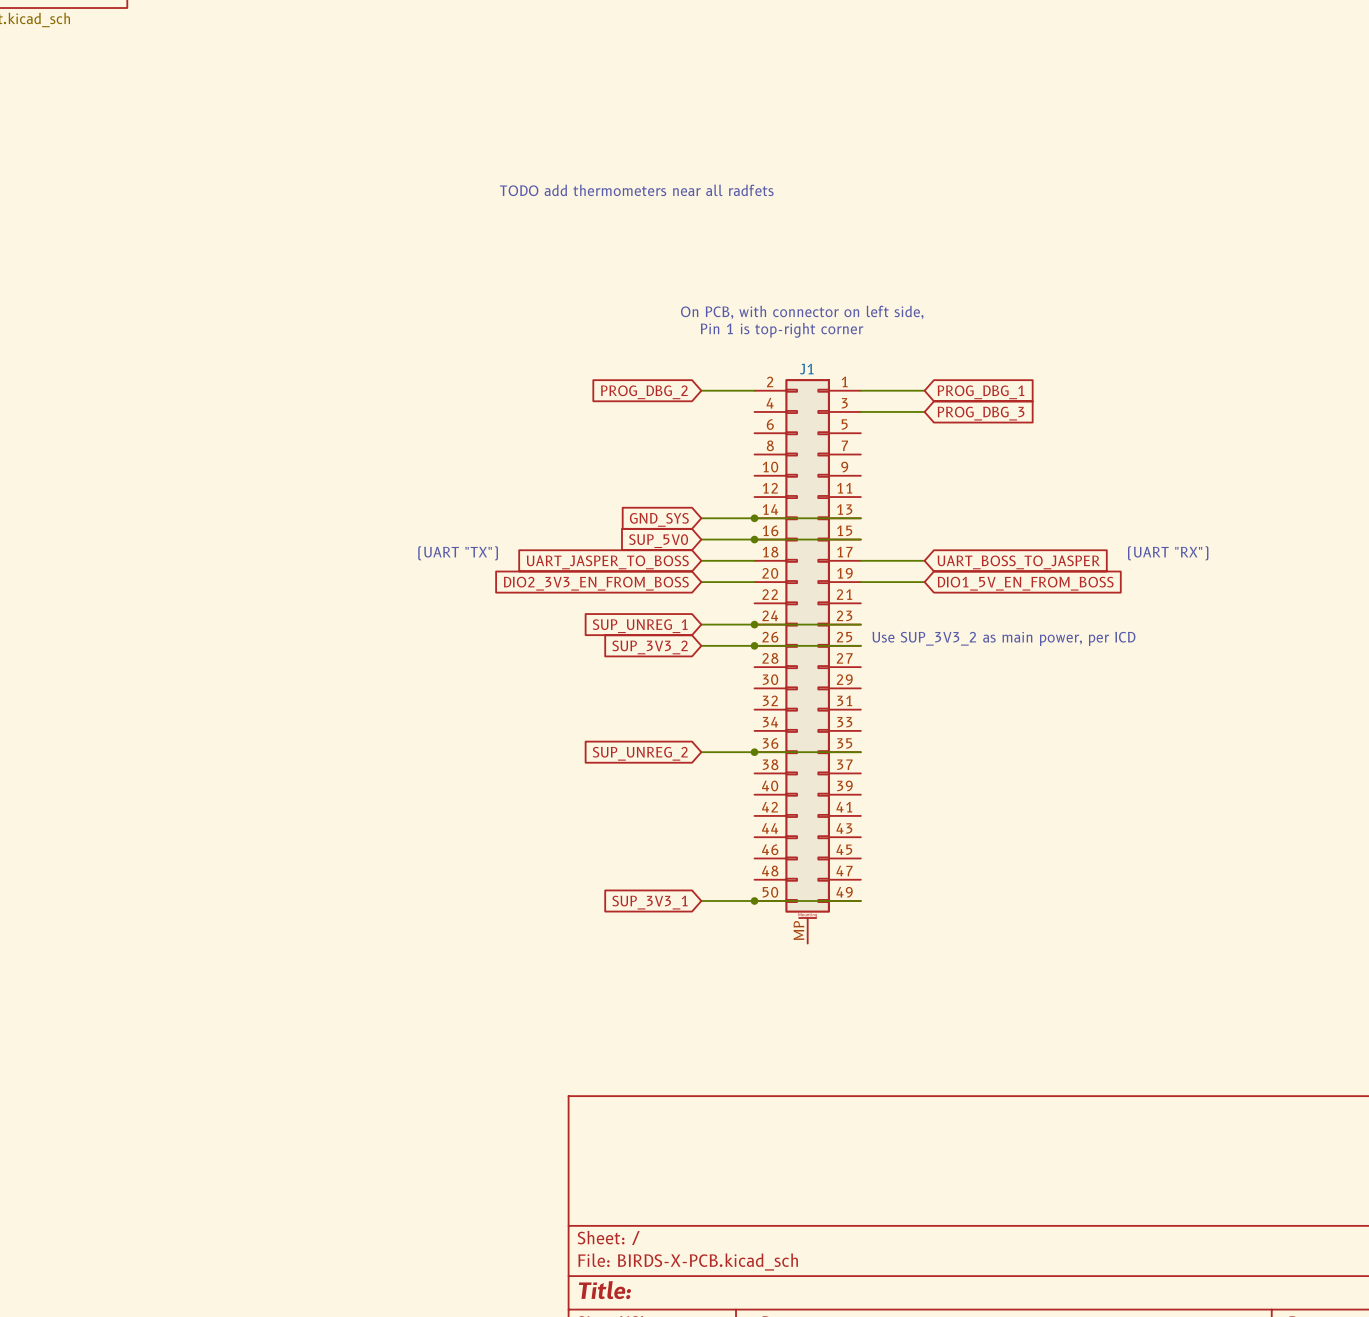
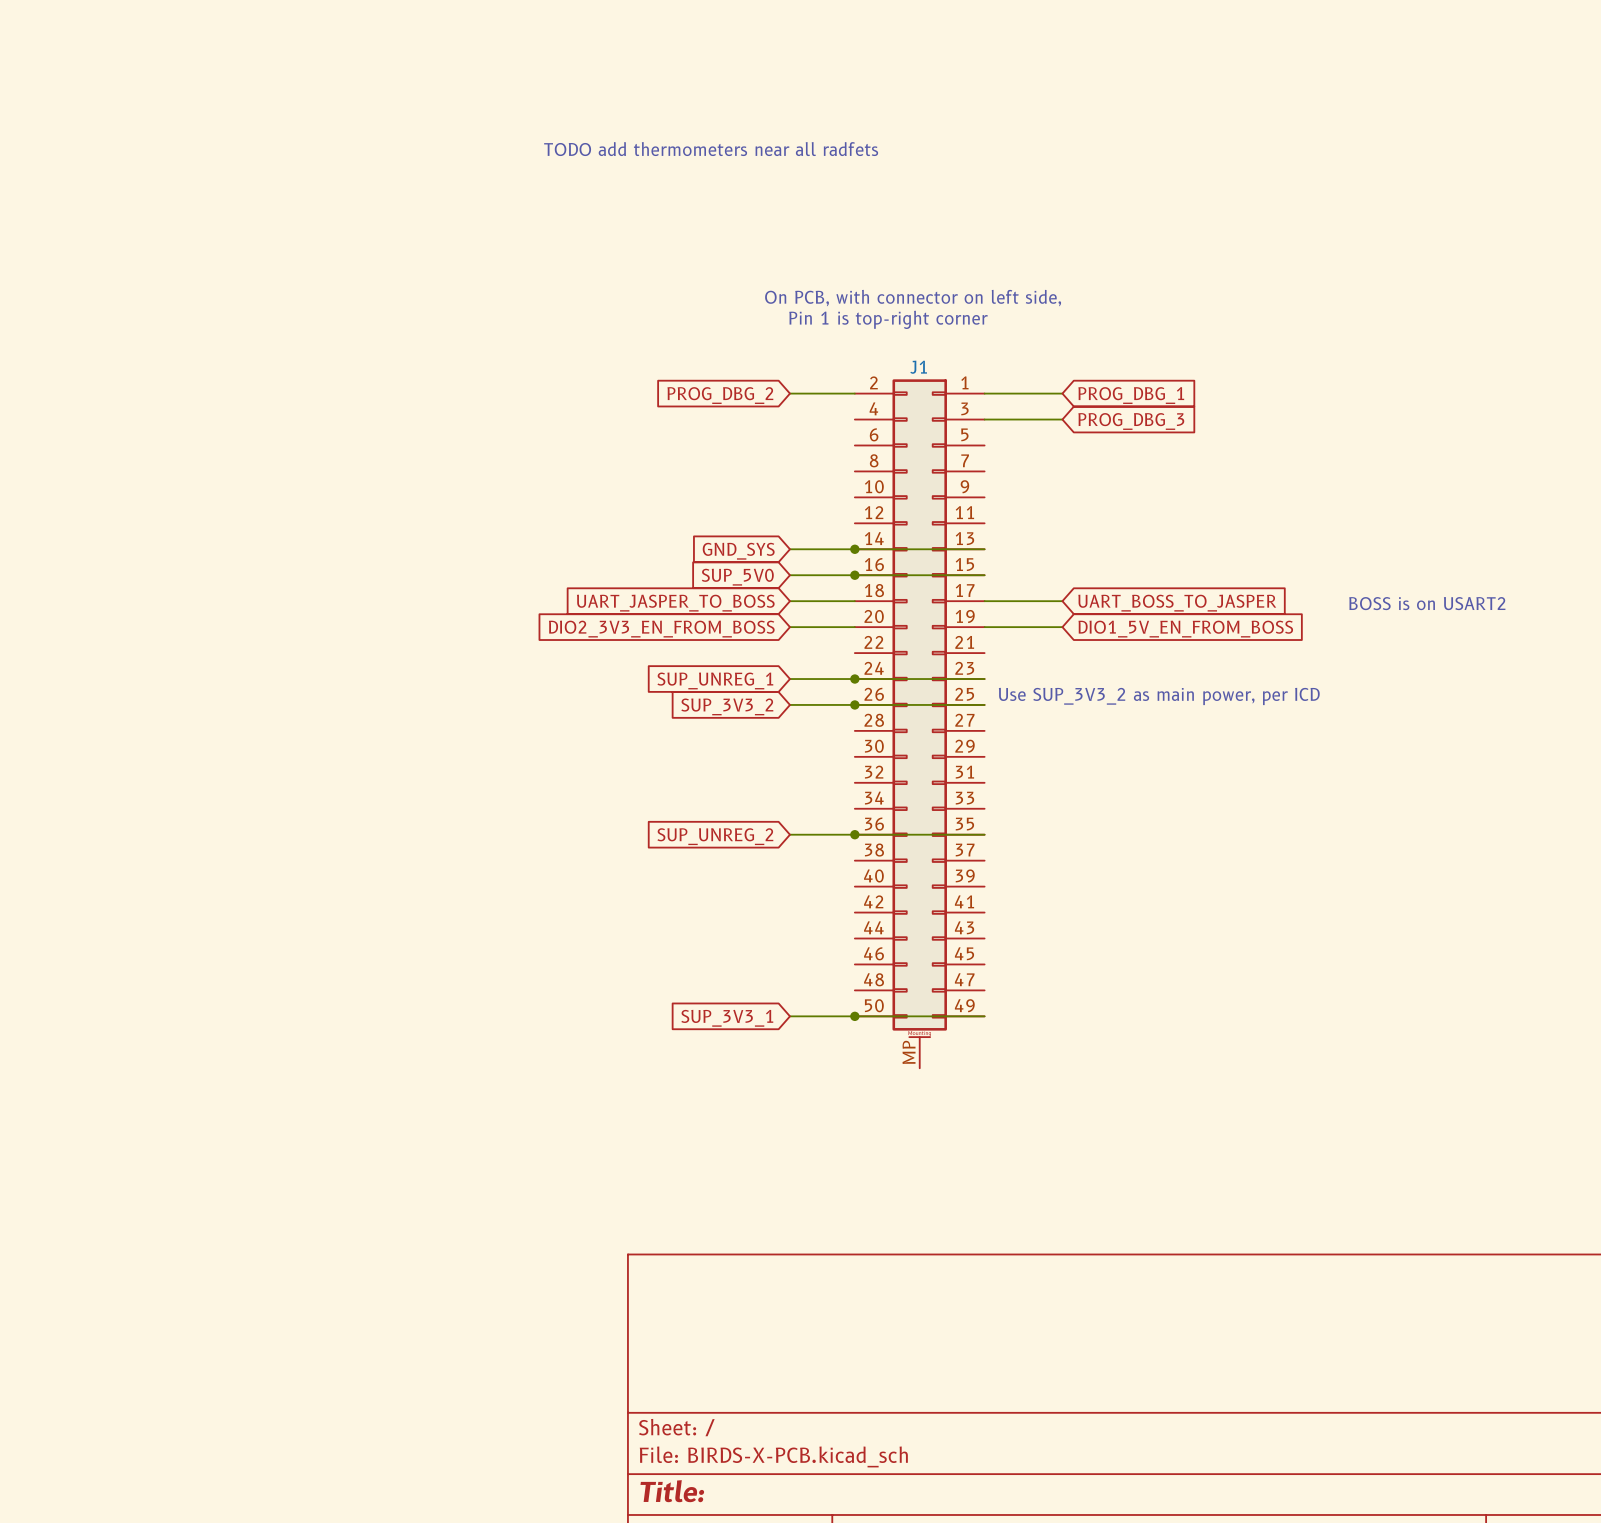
text: (UART "TX") (458, 553) -> none
text: (UART "RX") (1168, 553) -> none
text: none -> BOSS is on USART2 (1427, 603)

